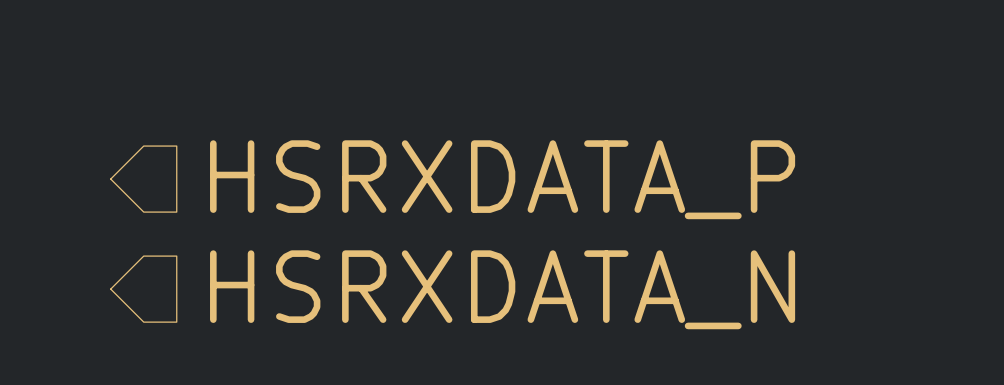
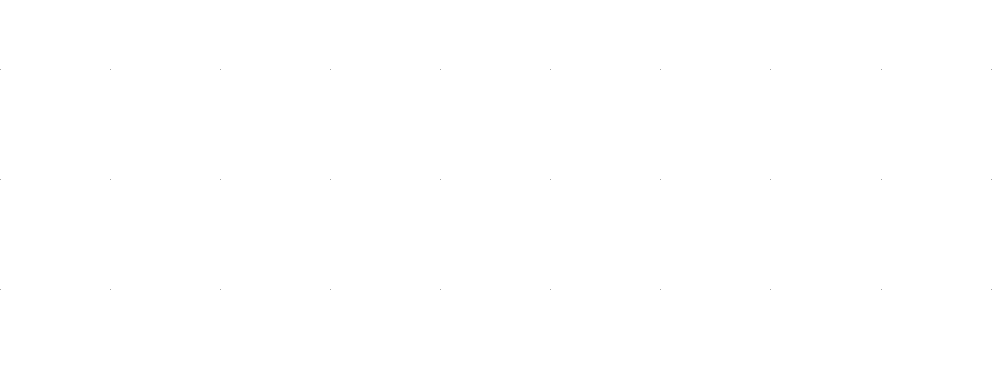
hierarchical label: HSRXDATA_P (502, 179) -> none
hierarchical label: HSRXDATA_N (502, 289) -> none

